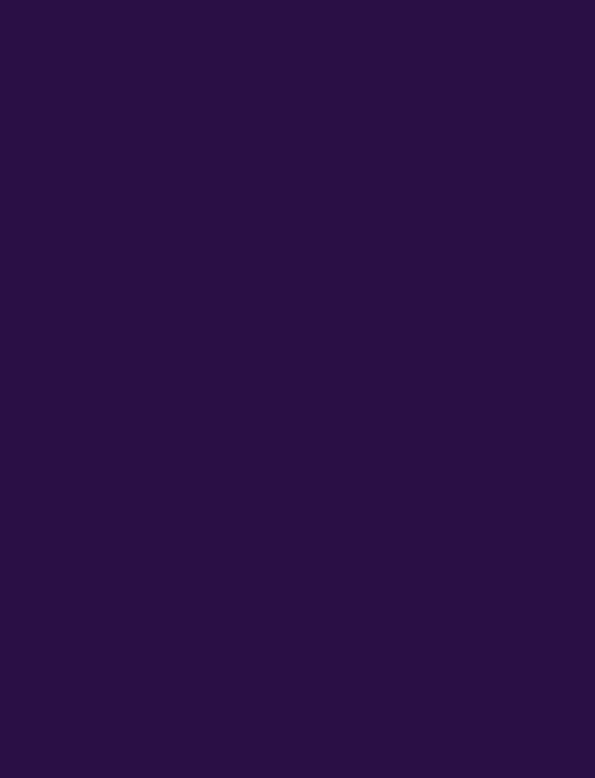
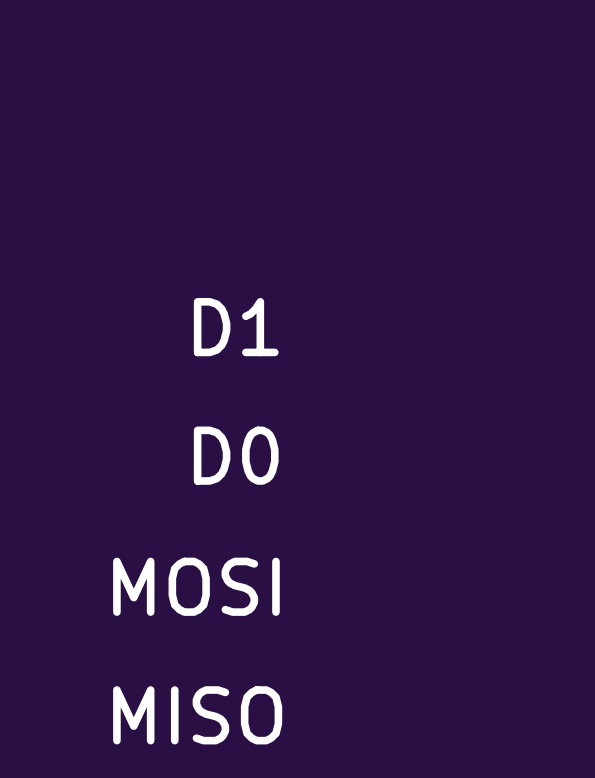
text: none -> D1 (236, 327)
text: none -> D0 (236, 455)
text: none -> MOSI (196, 586)
text: none -> MISO (197, 715)

